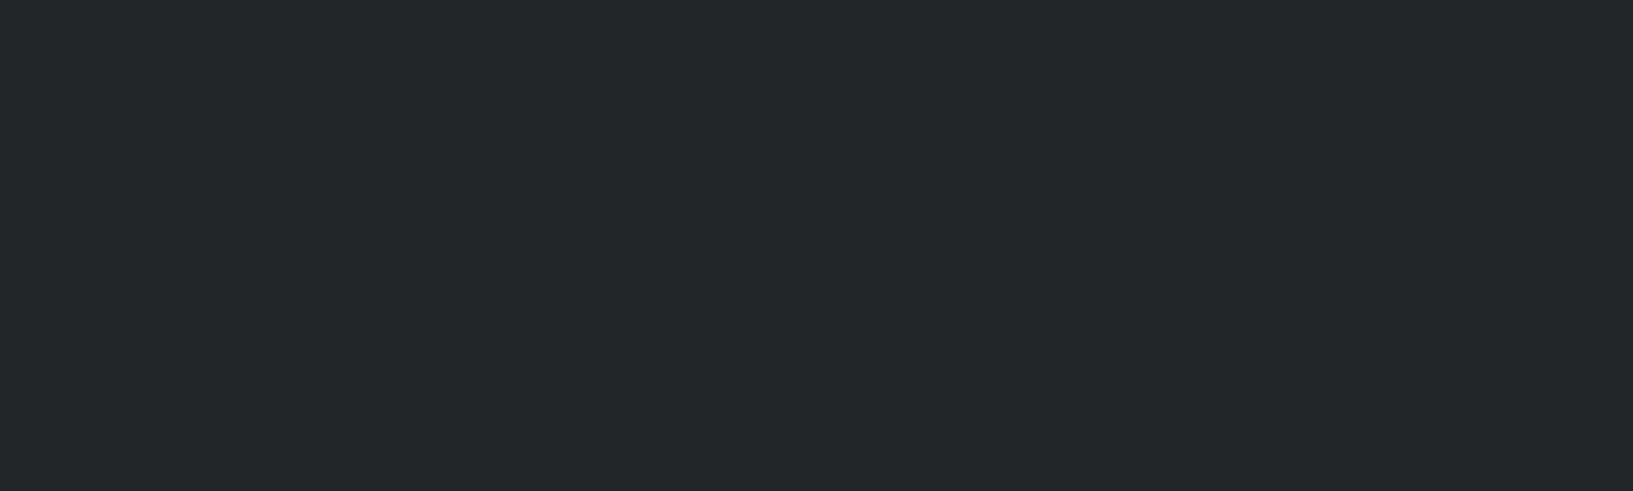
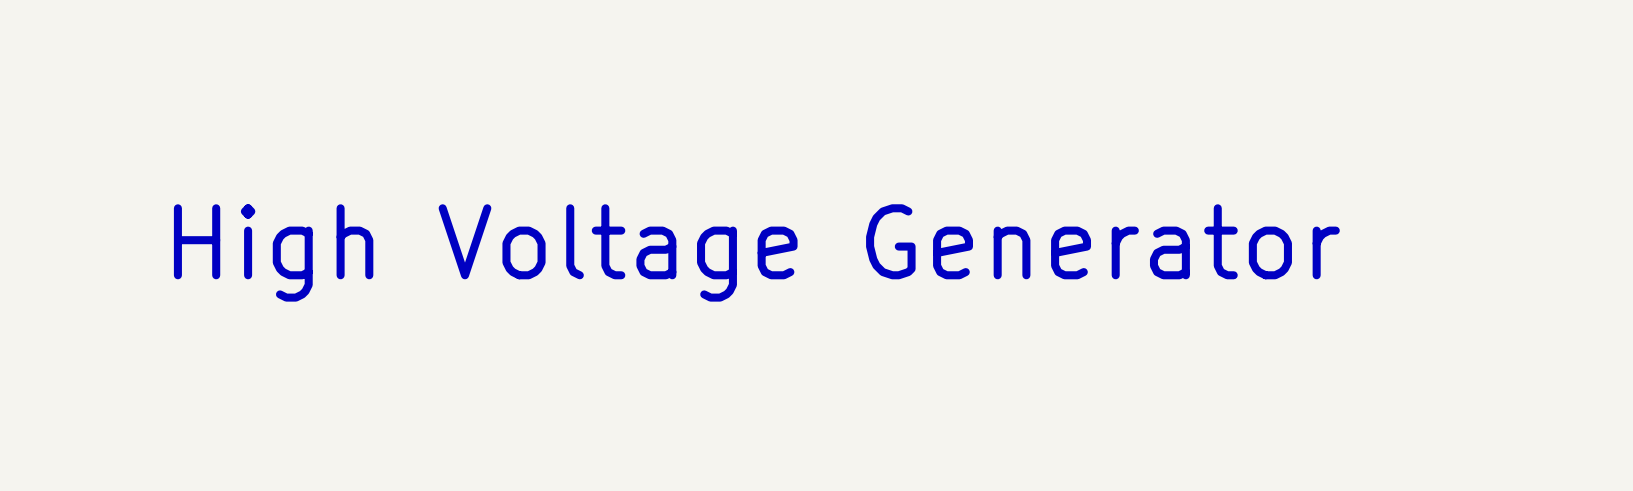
text: none -> High Voltage Generator (756, 252)

